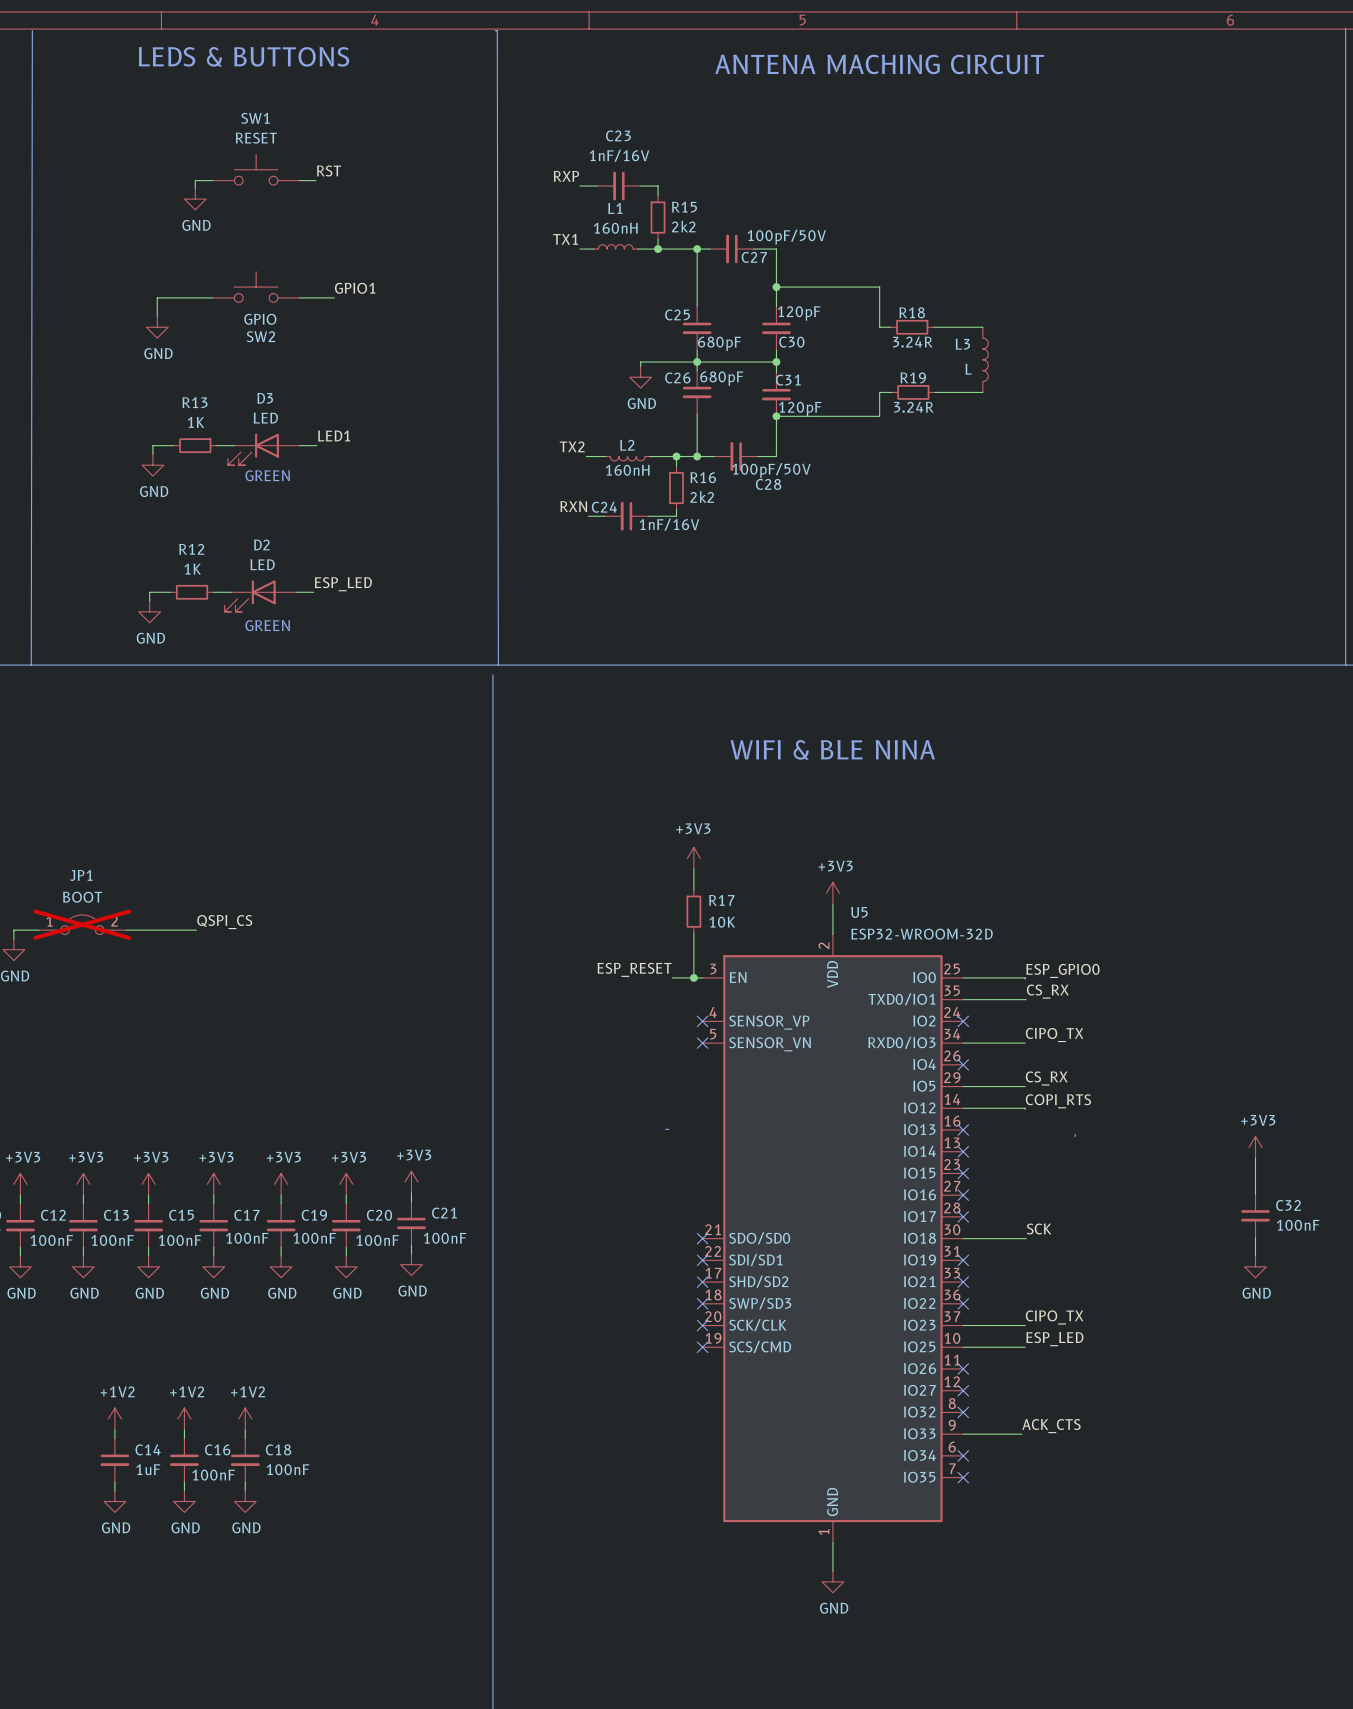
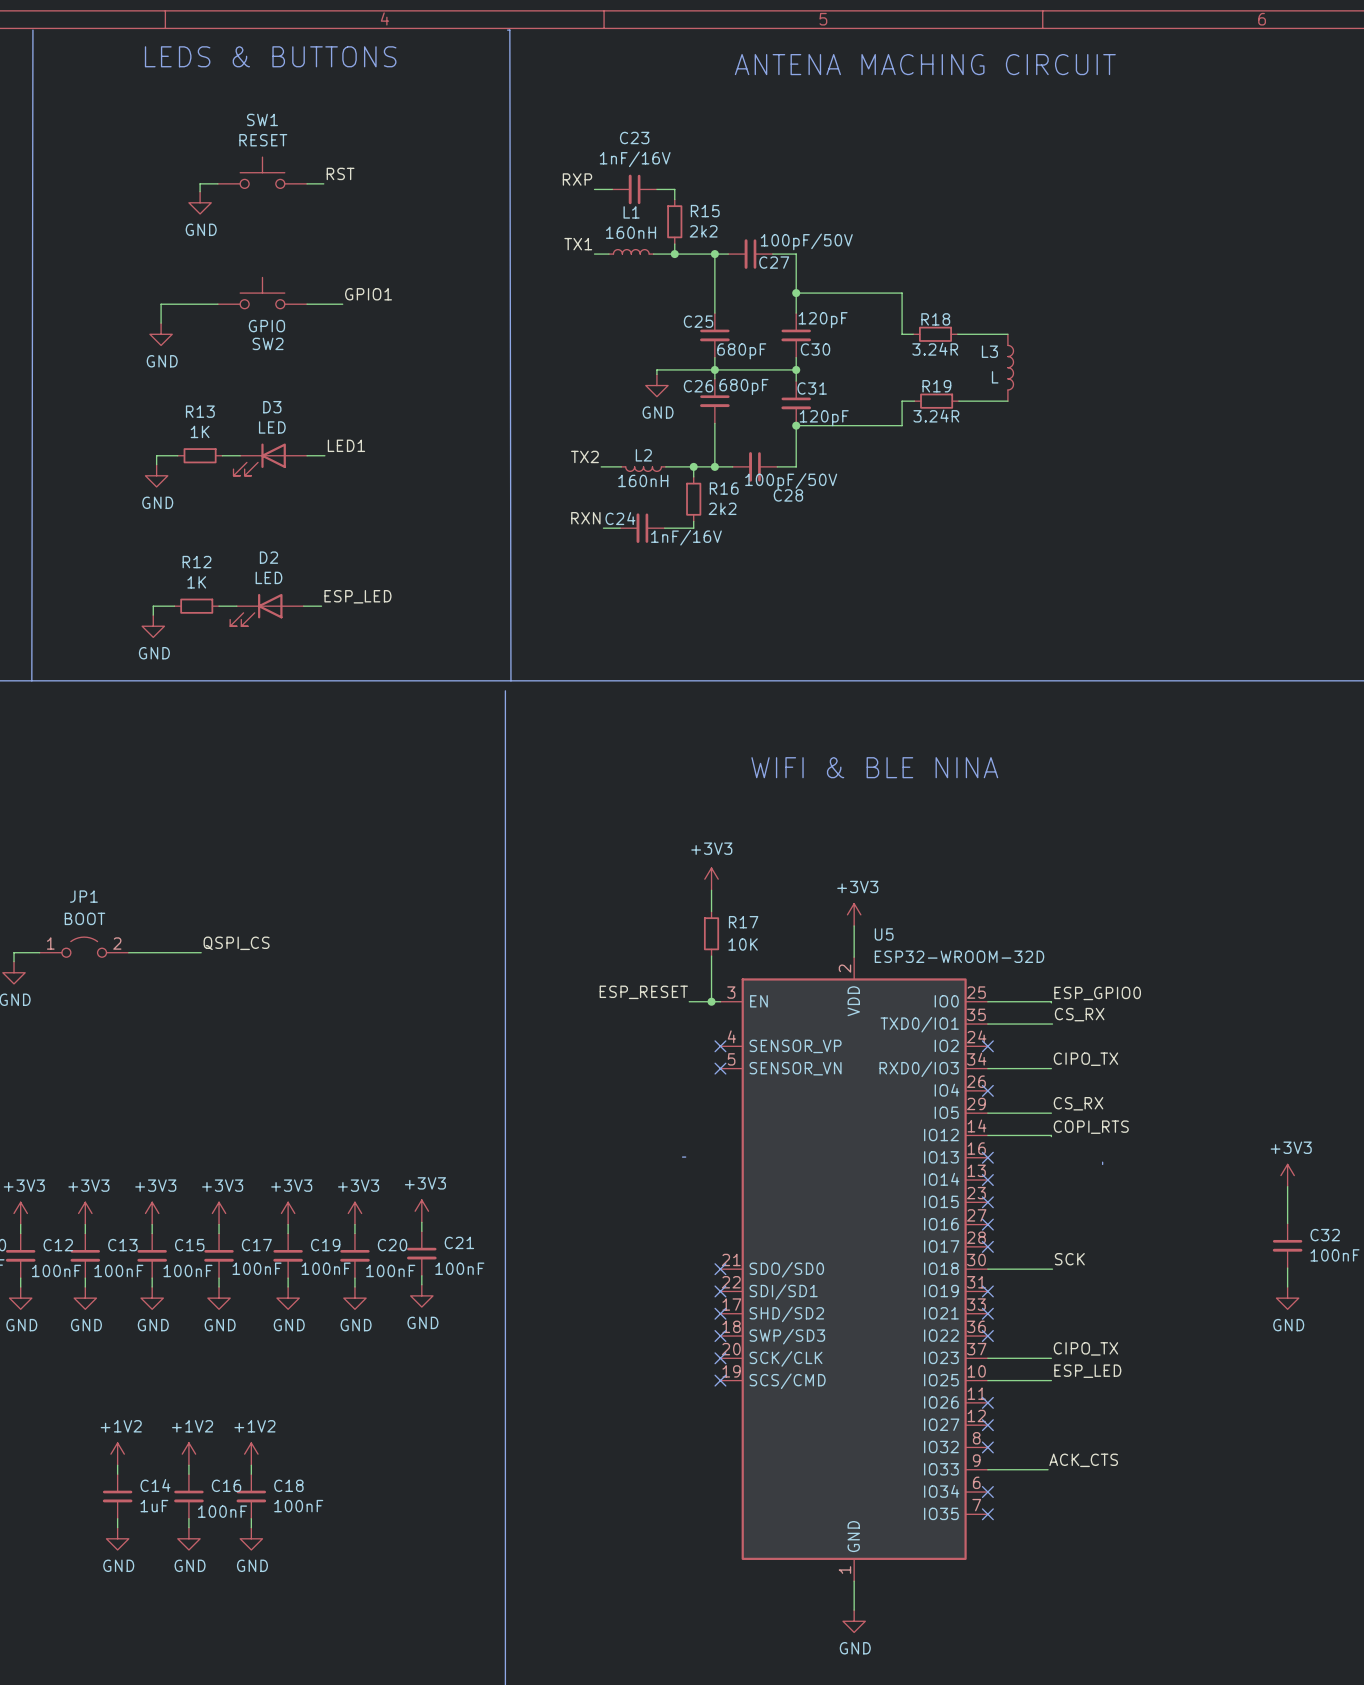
text: GREEN (267, 475) -> none
text: GREEN (267, 625) -> none
JP1 do-not-place cross: (82, 924) -> none

